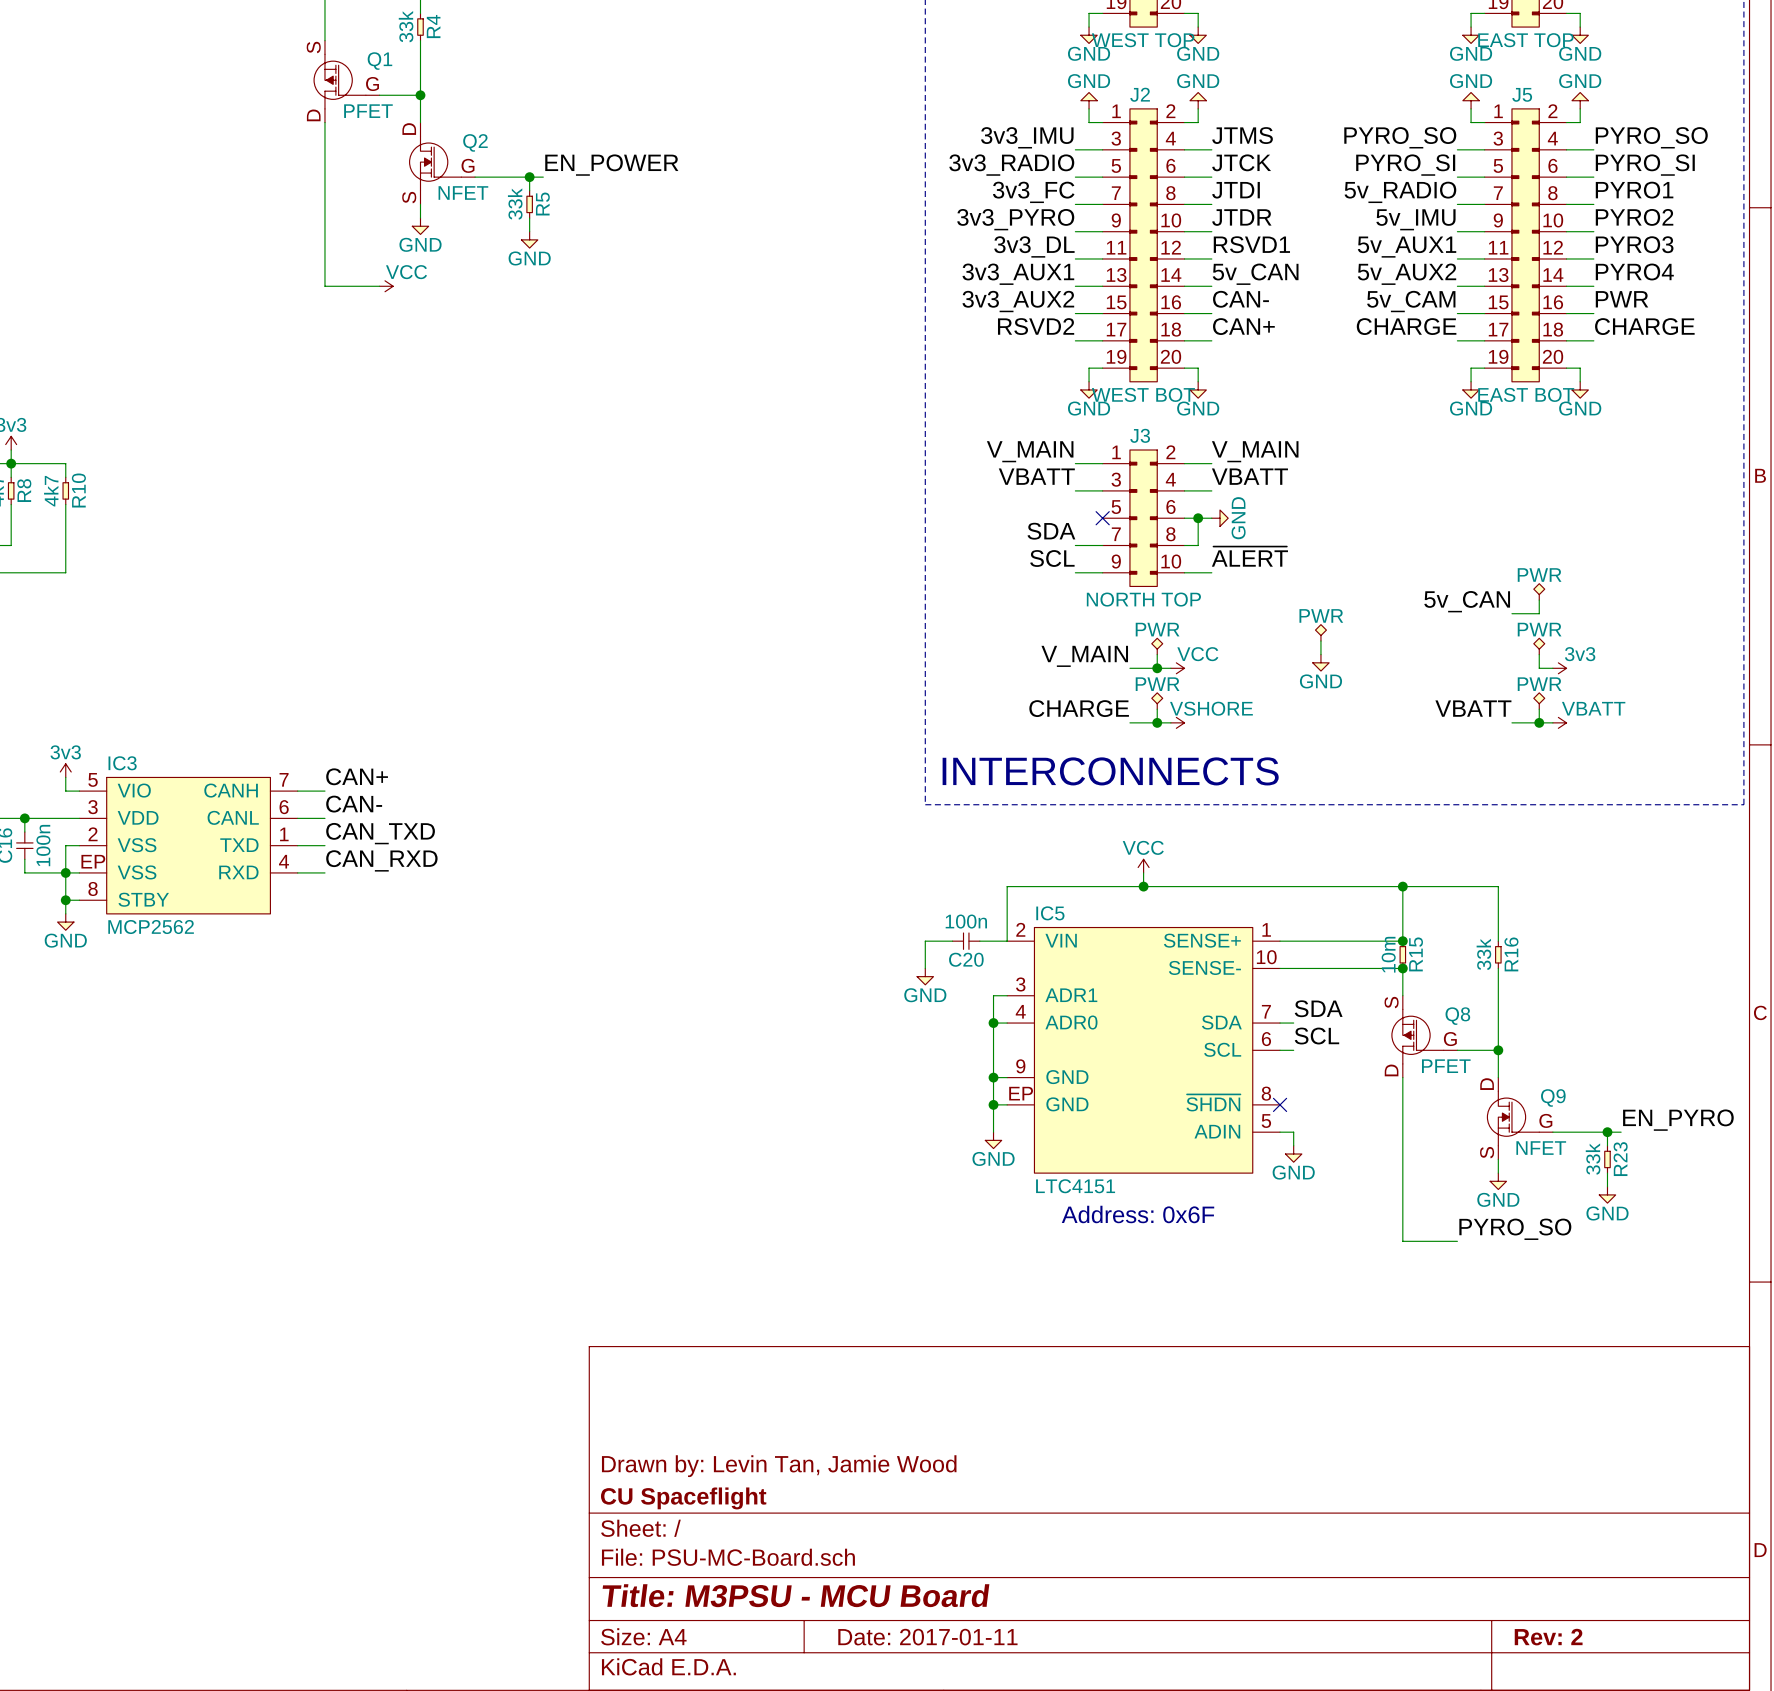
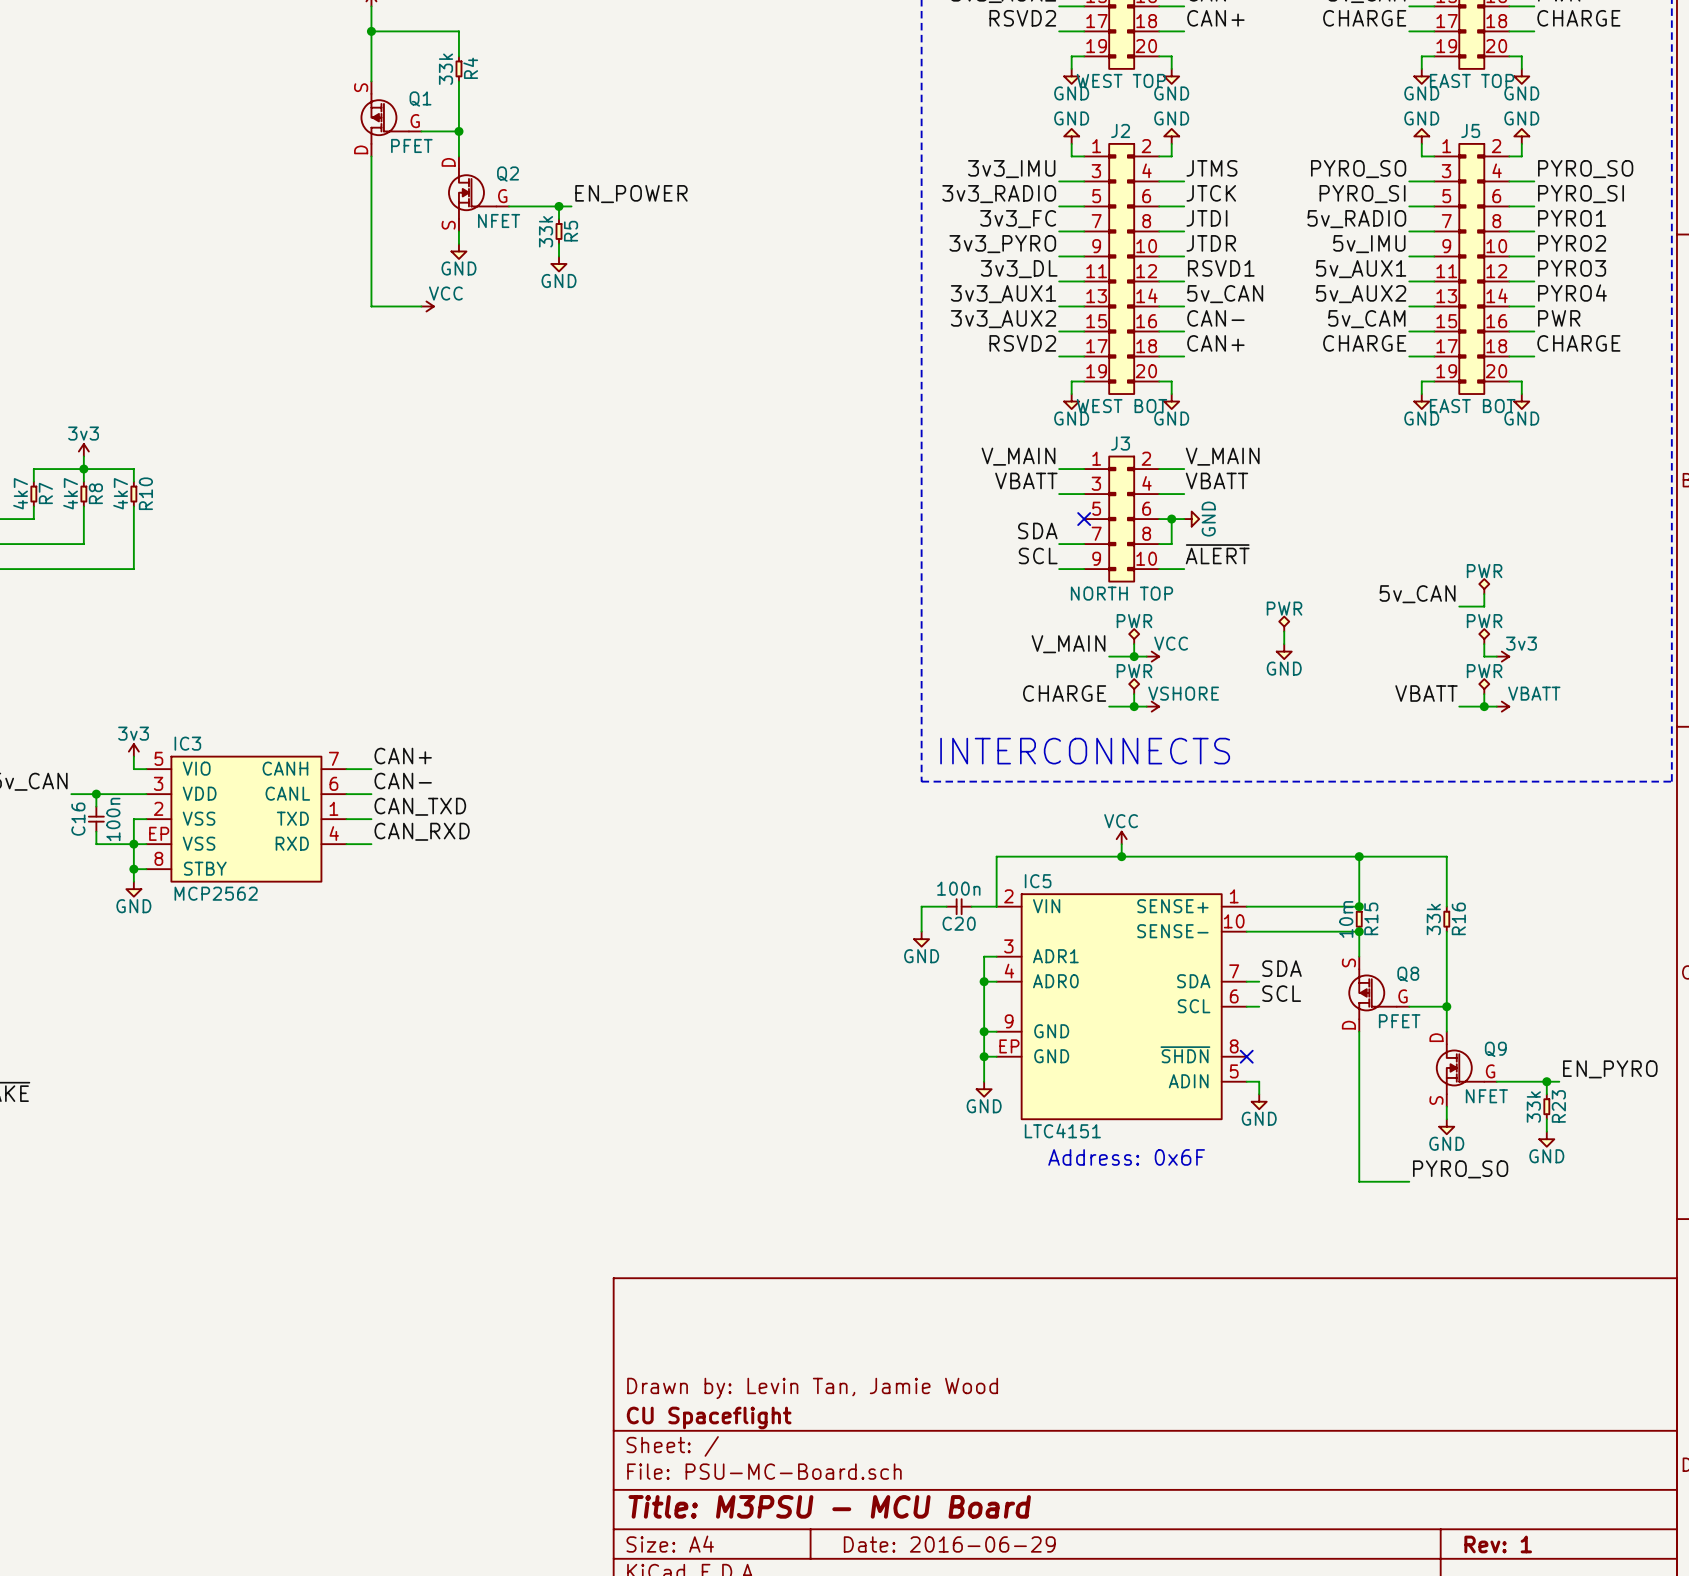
title block: Date: 2017-01-11 (927, 1637) -> Date: 2016-06-29 (949, 1544)
title block: Rev: 2 (1548, 1637) -> Rev: 1 (1498, 1544)

